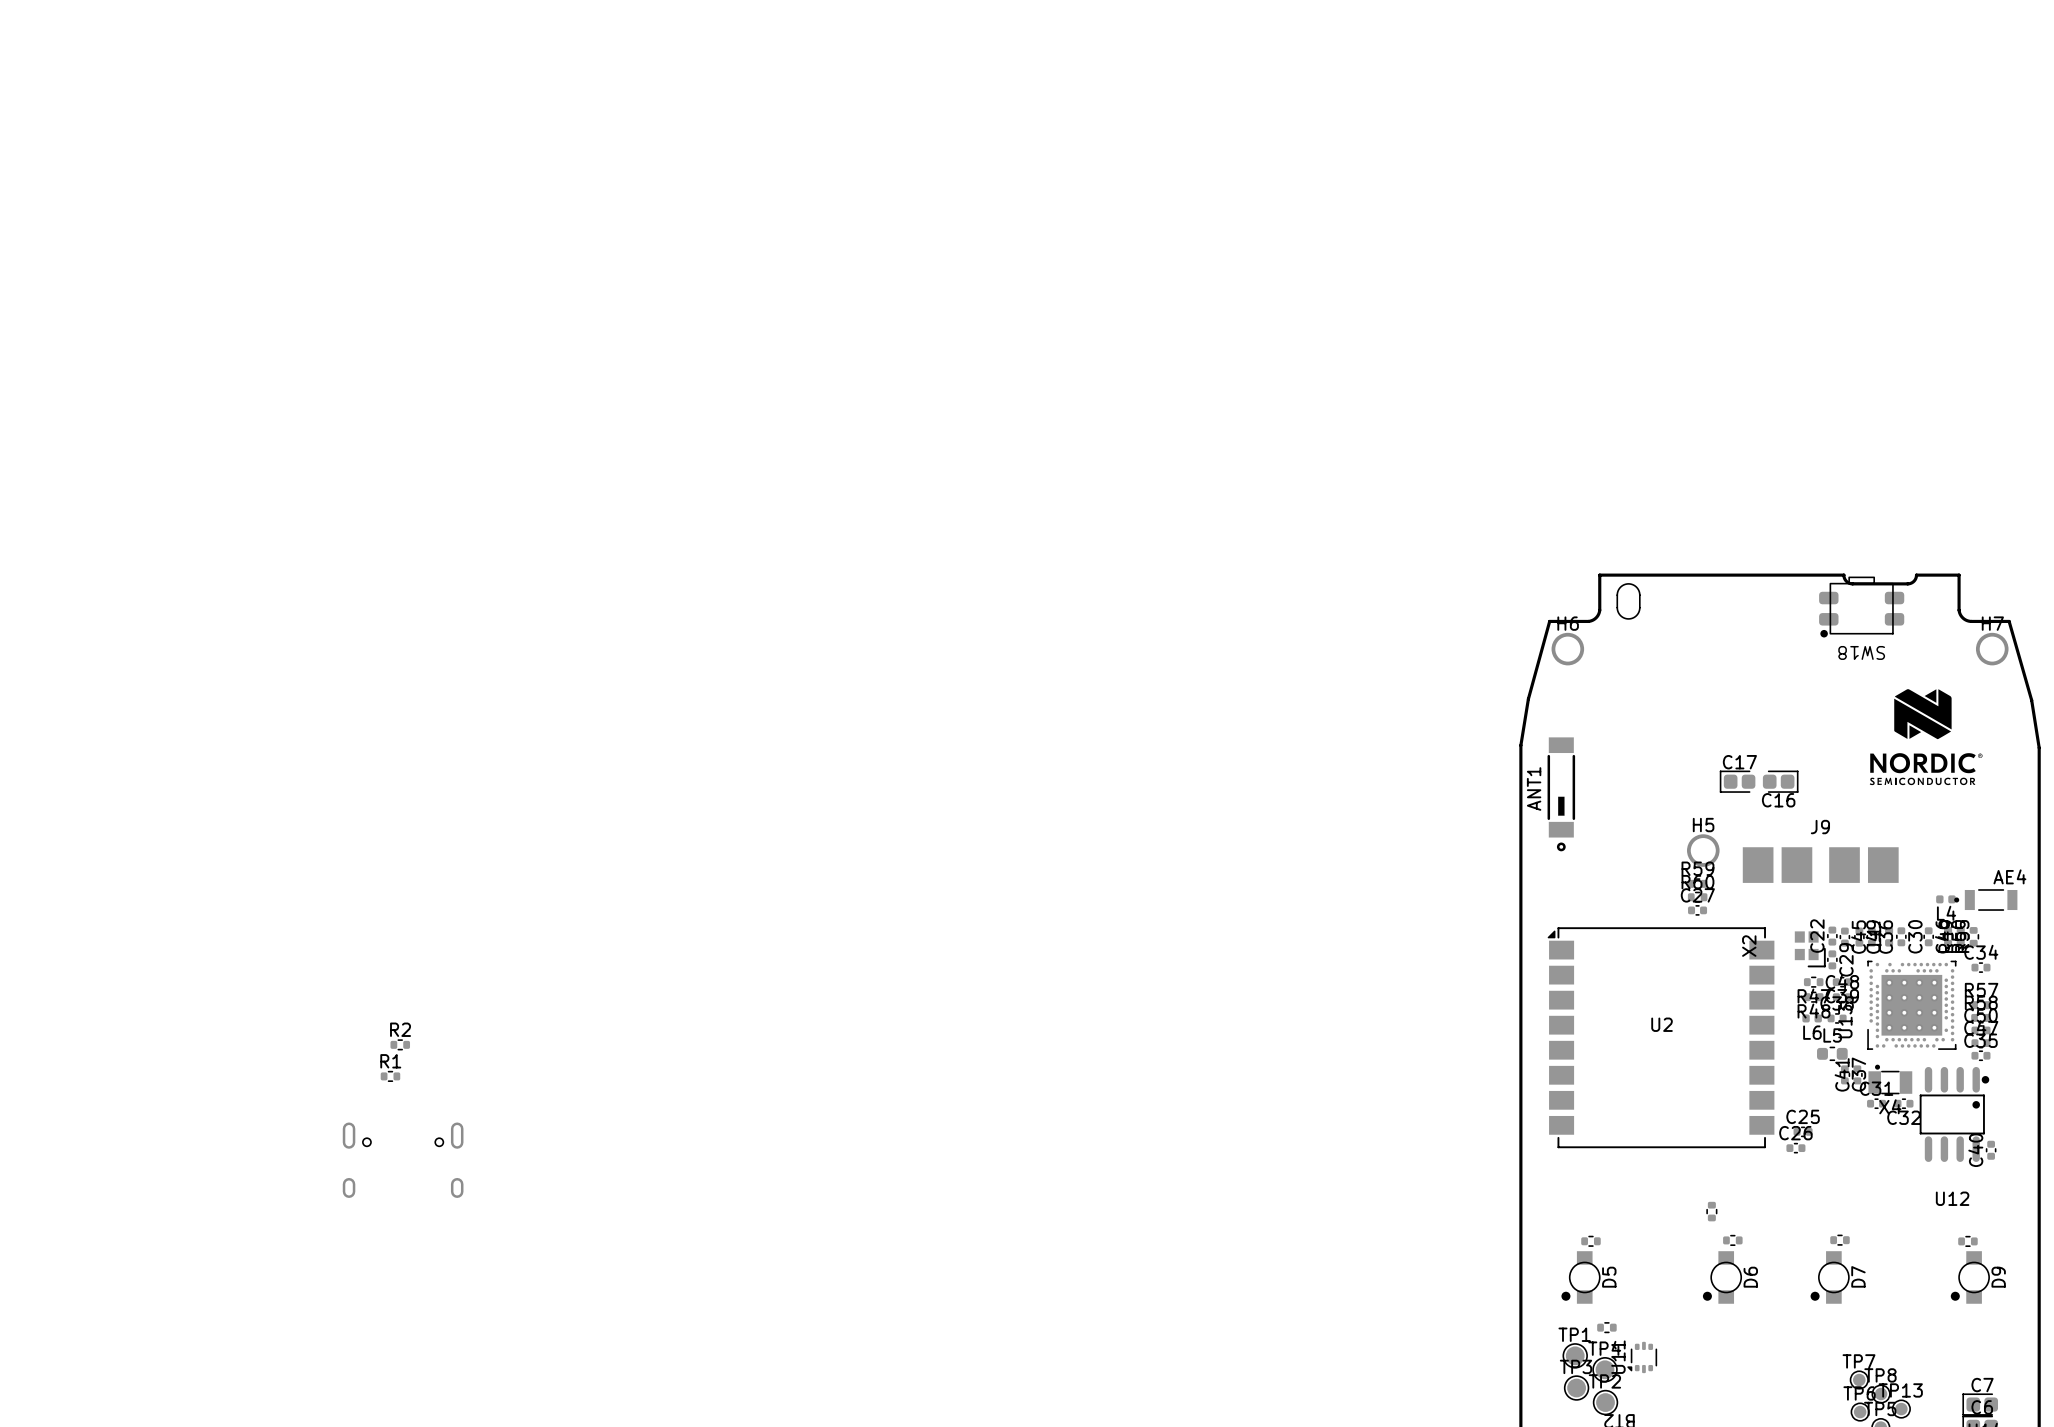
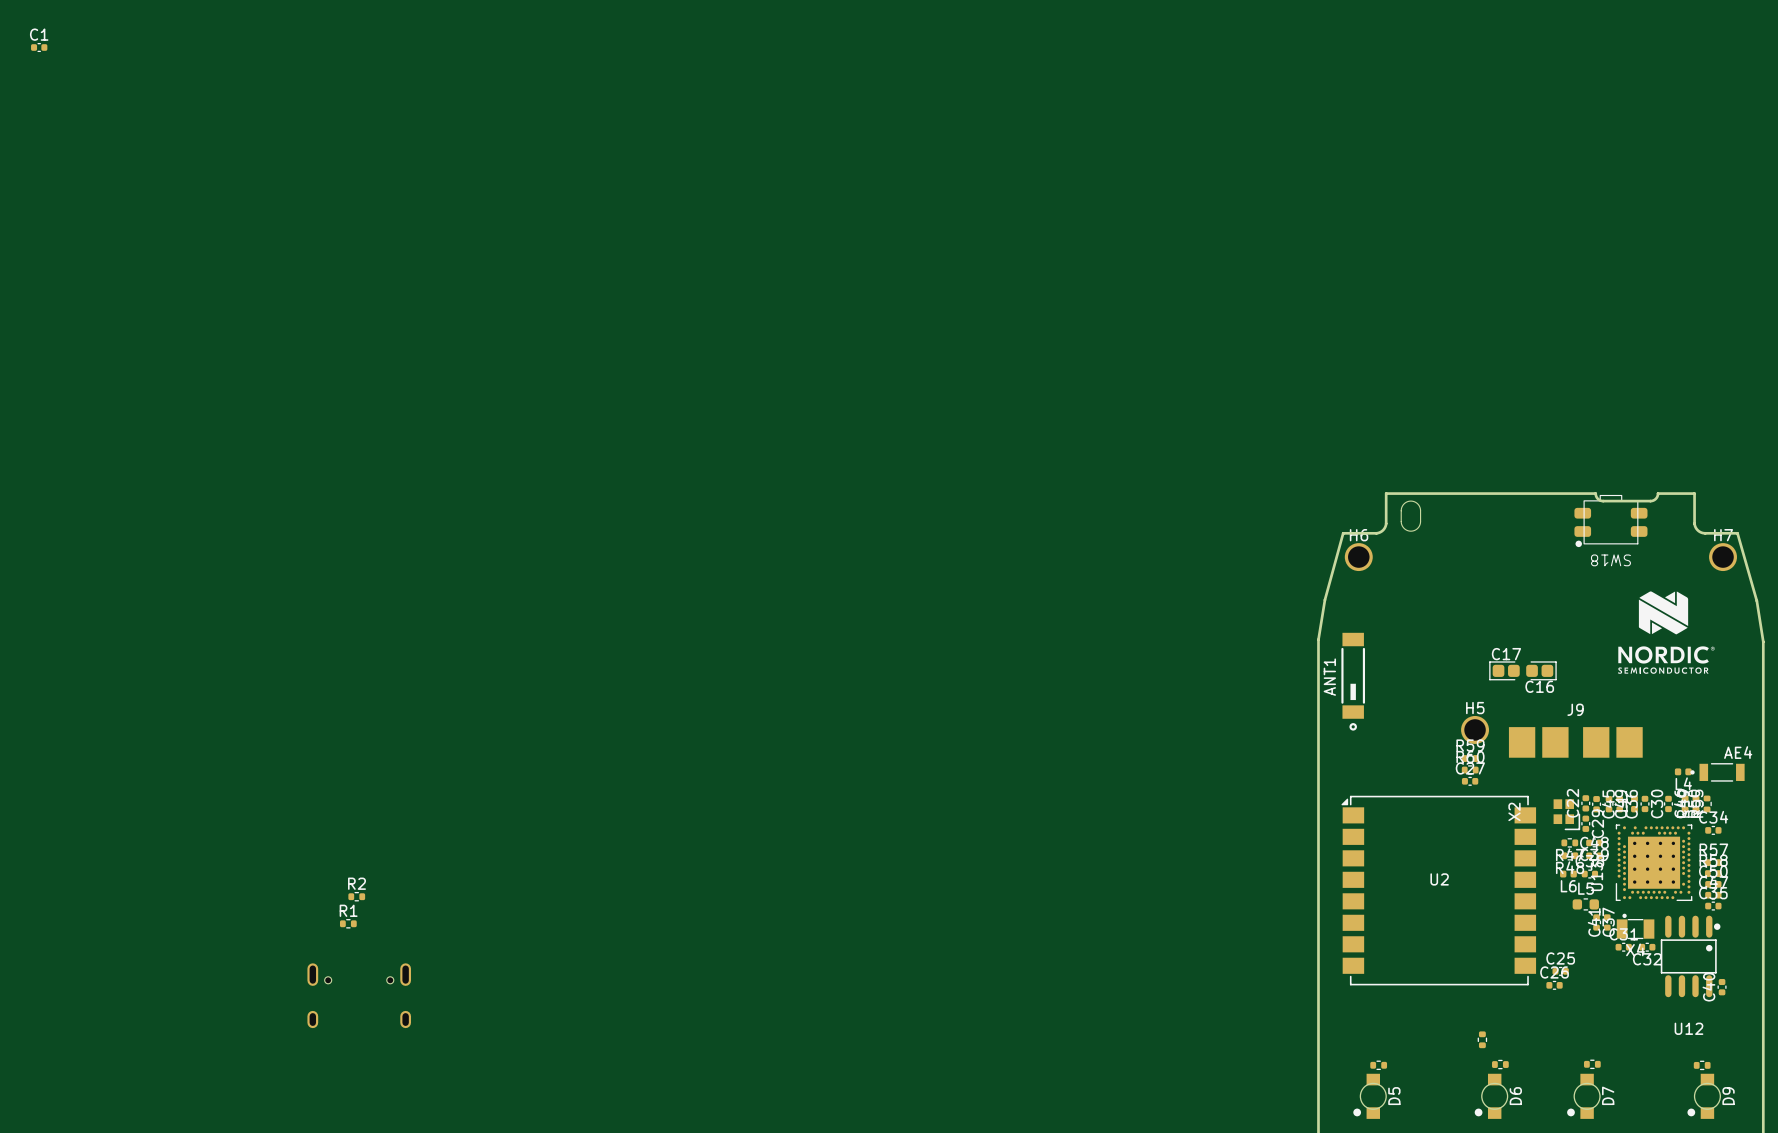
C1: none -> (39, 47)

